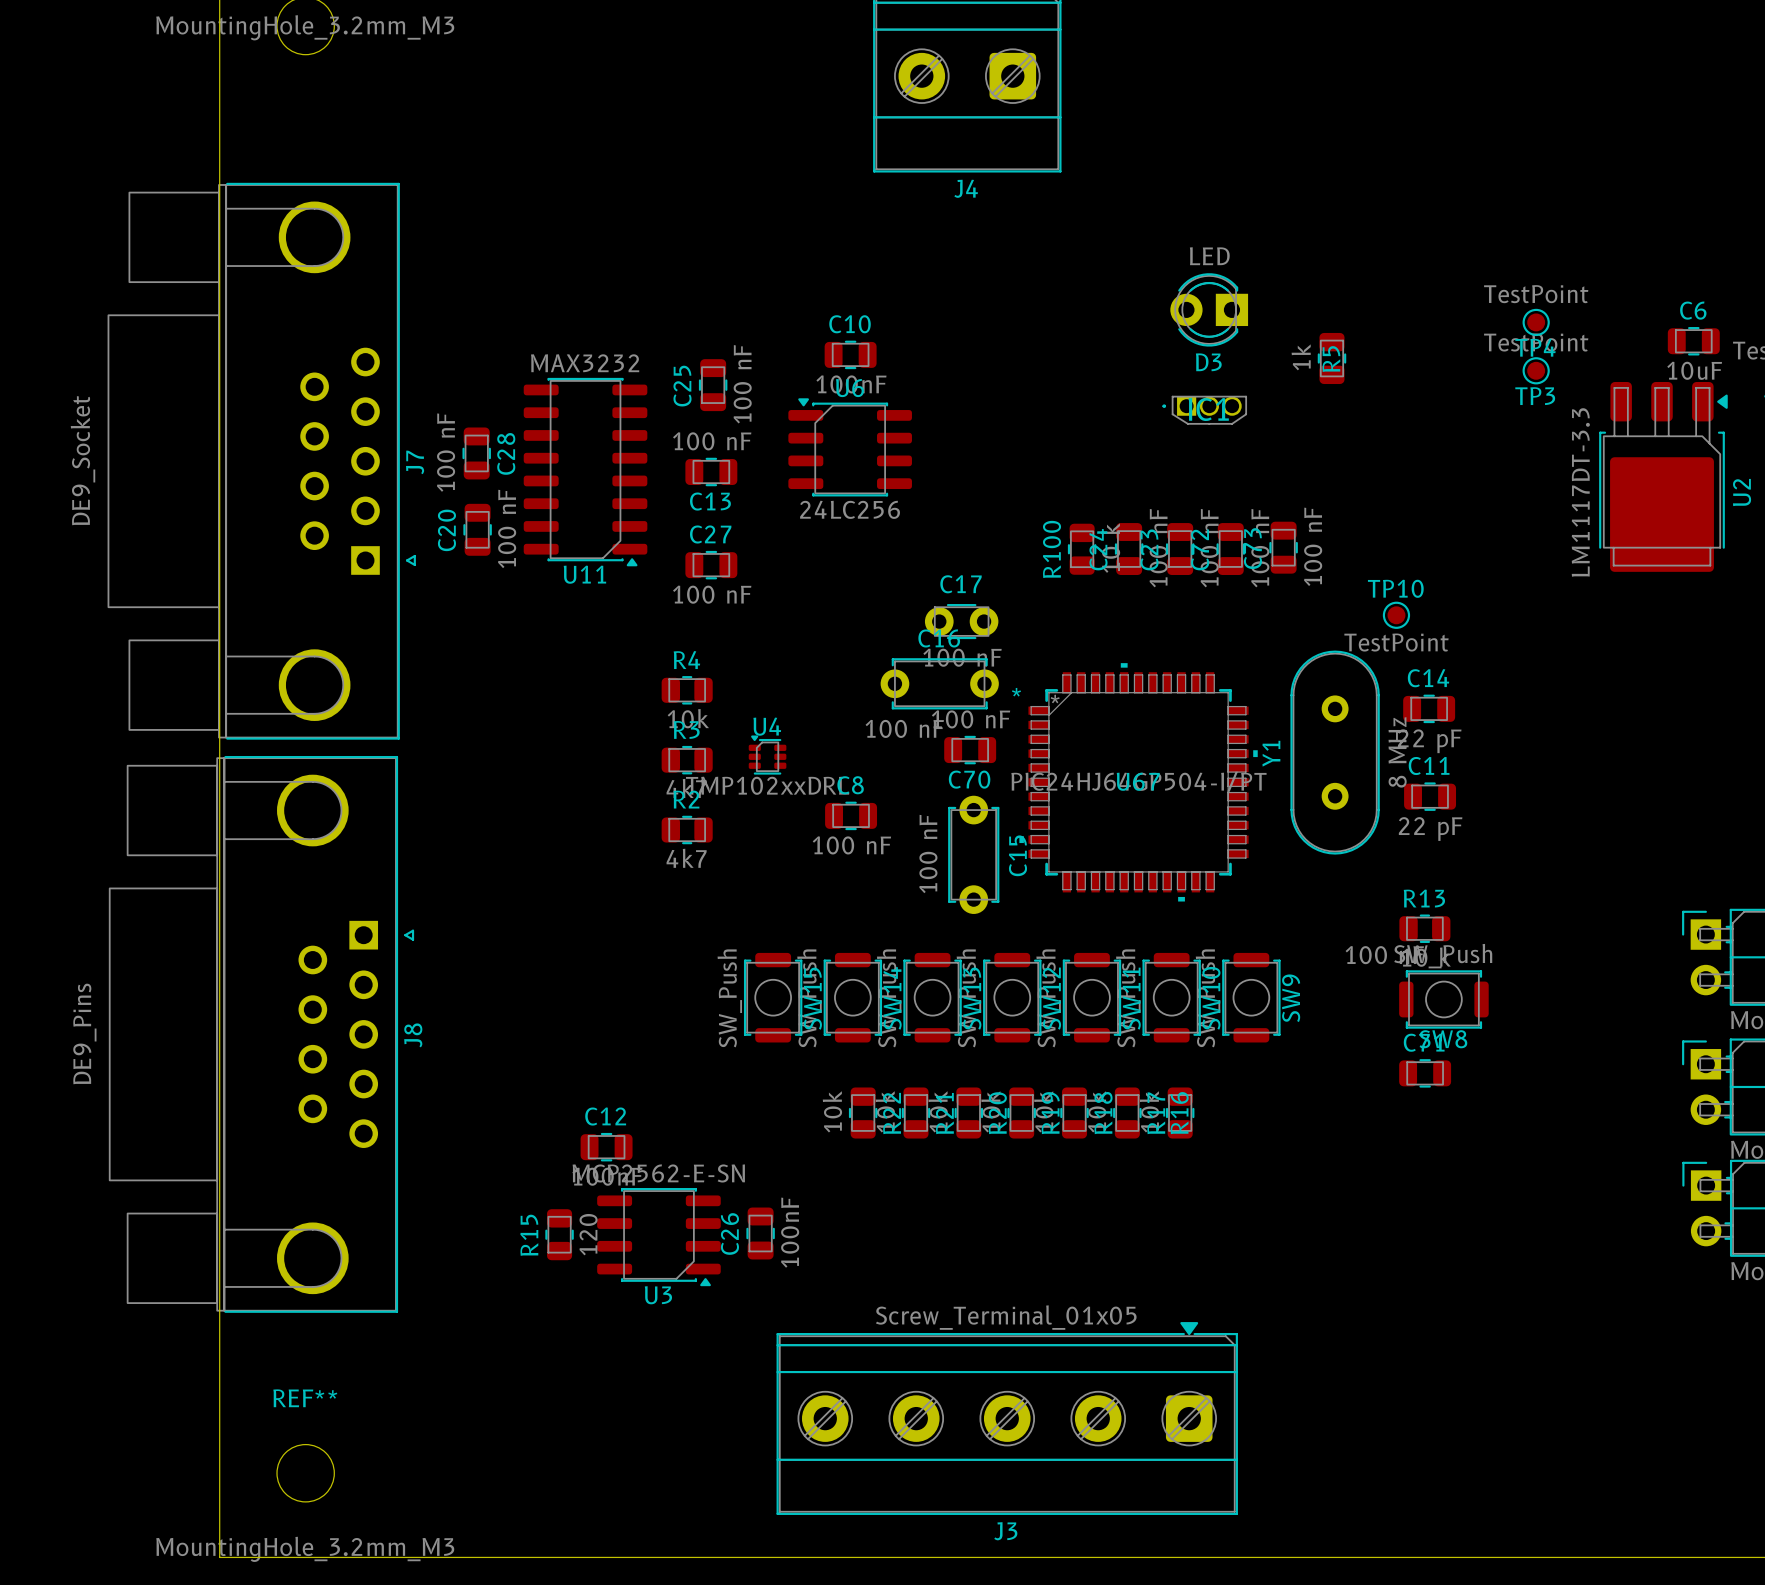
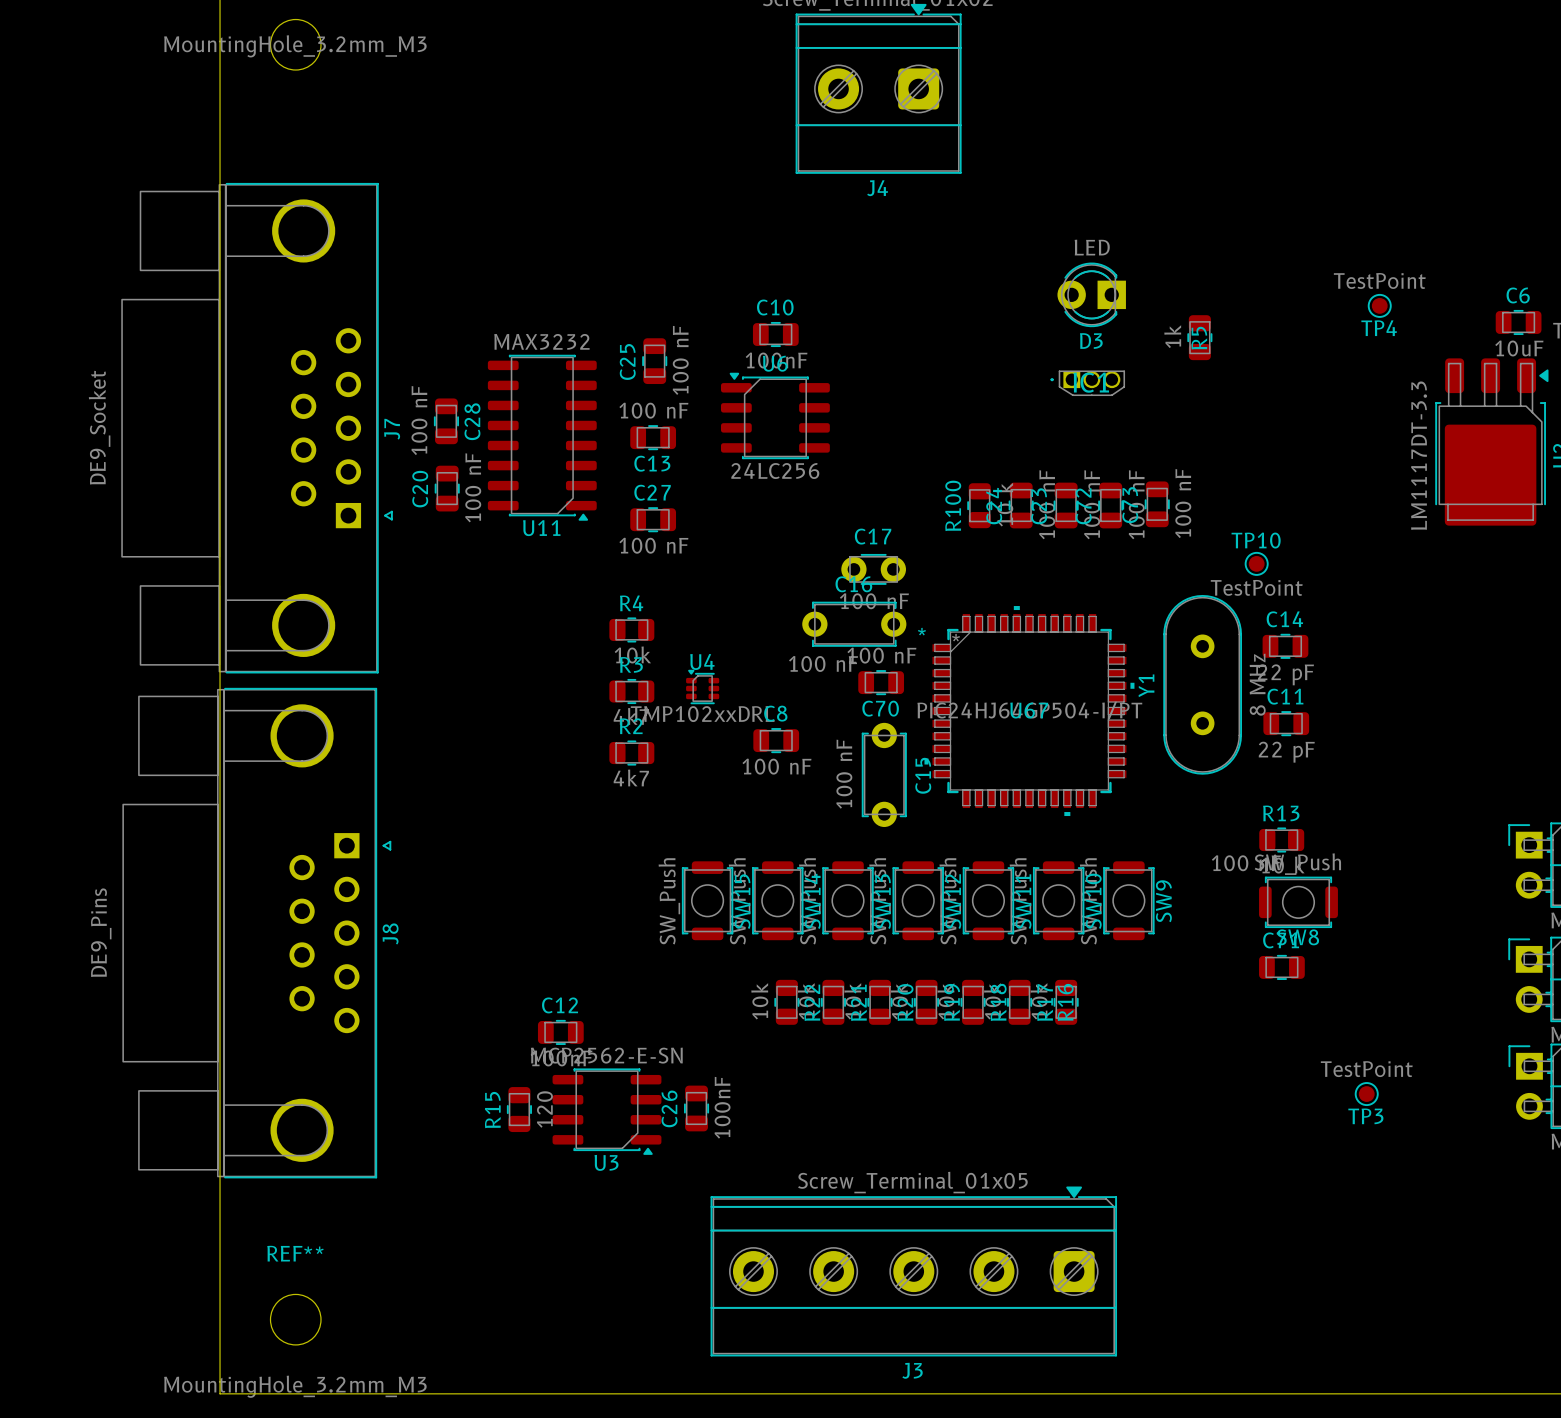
TP3 position: (1536, 370) -> (1366, 1094)

